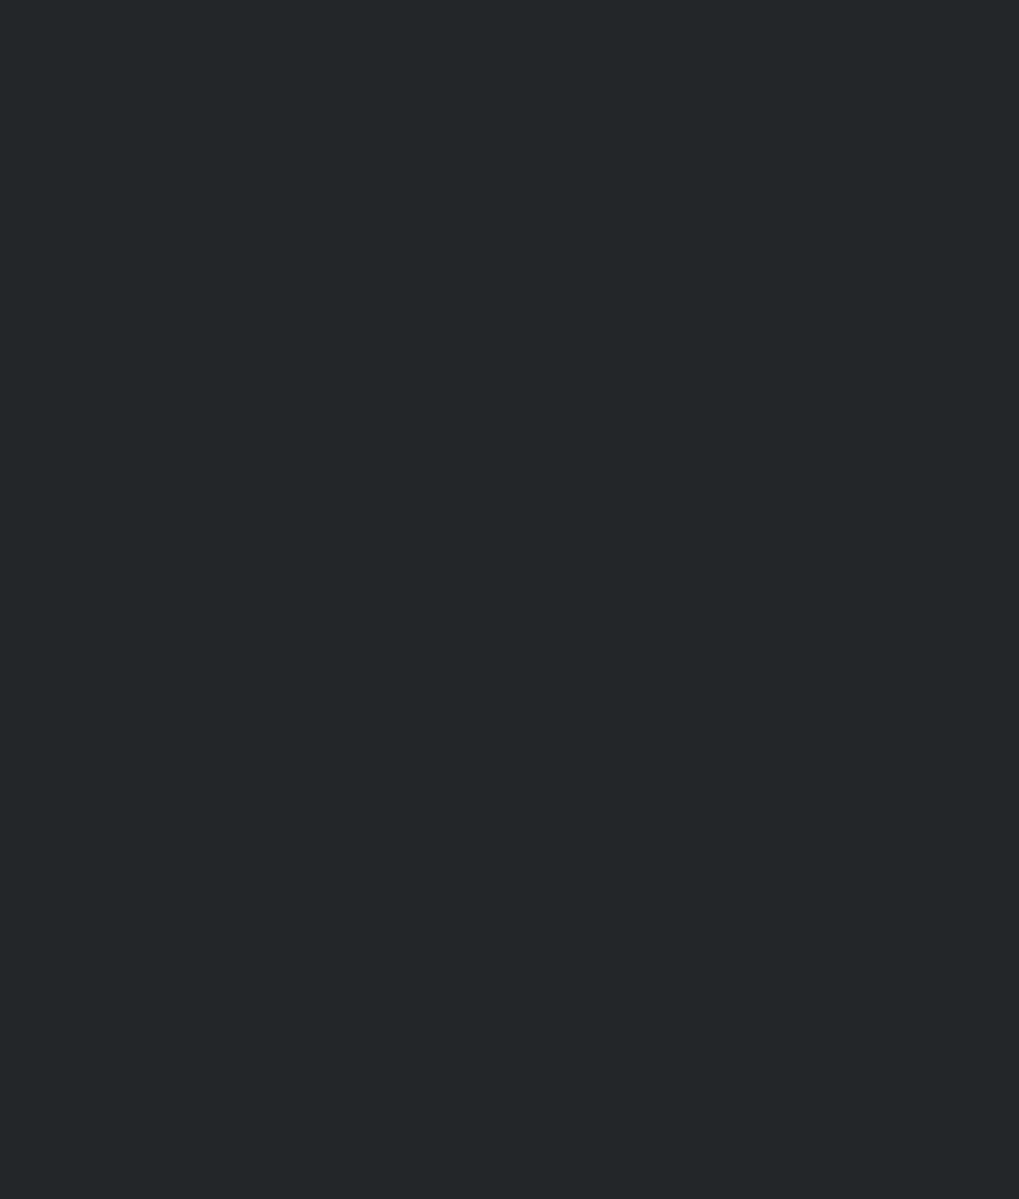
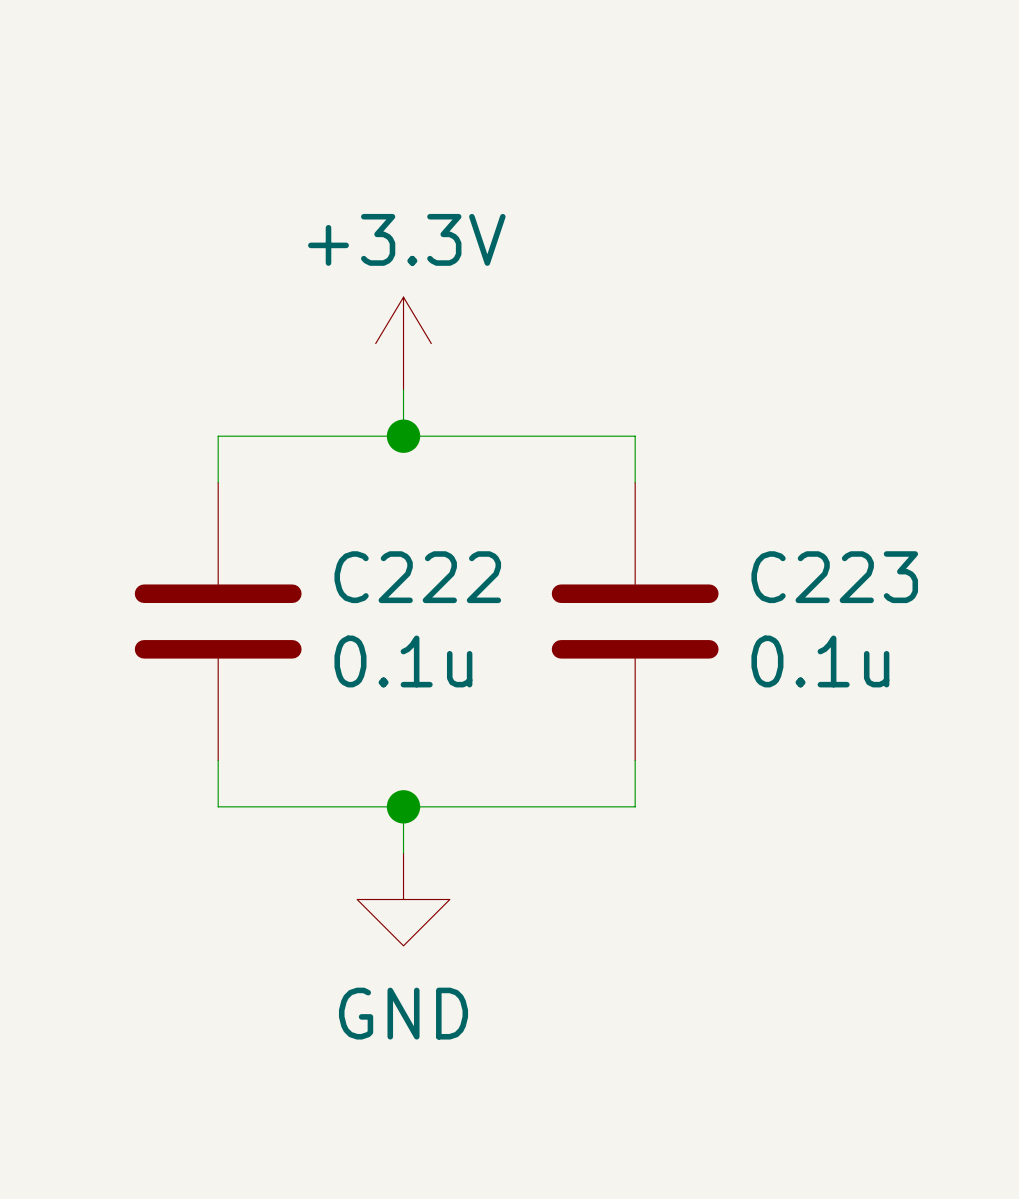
power symbol: none -> +3.3V (403, 343)
wire: none -> (403, 389) (403, 436)
junction: none -> (403, 436)
wire: none -> (218, 482) (218, 436) (635, 436) (635, 482)
C222: none -> 0.1u (218, 621)
C223: none -> 0.1u (635, 621)
wire: none -> (218, 760) (218, 806) (635, 806) (635, 760)
wire: none -> (403, 806) (403, 853)
junction: none -> (403, 806)
power symbol: none -> GND (403, 899)

